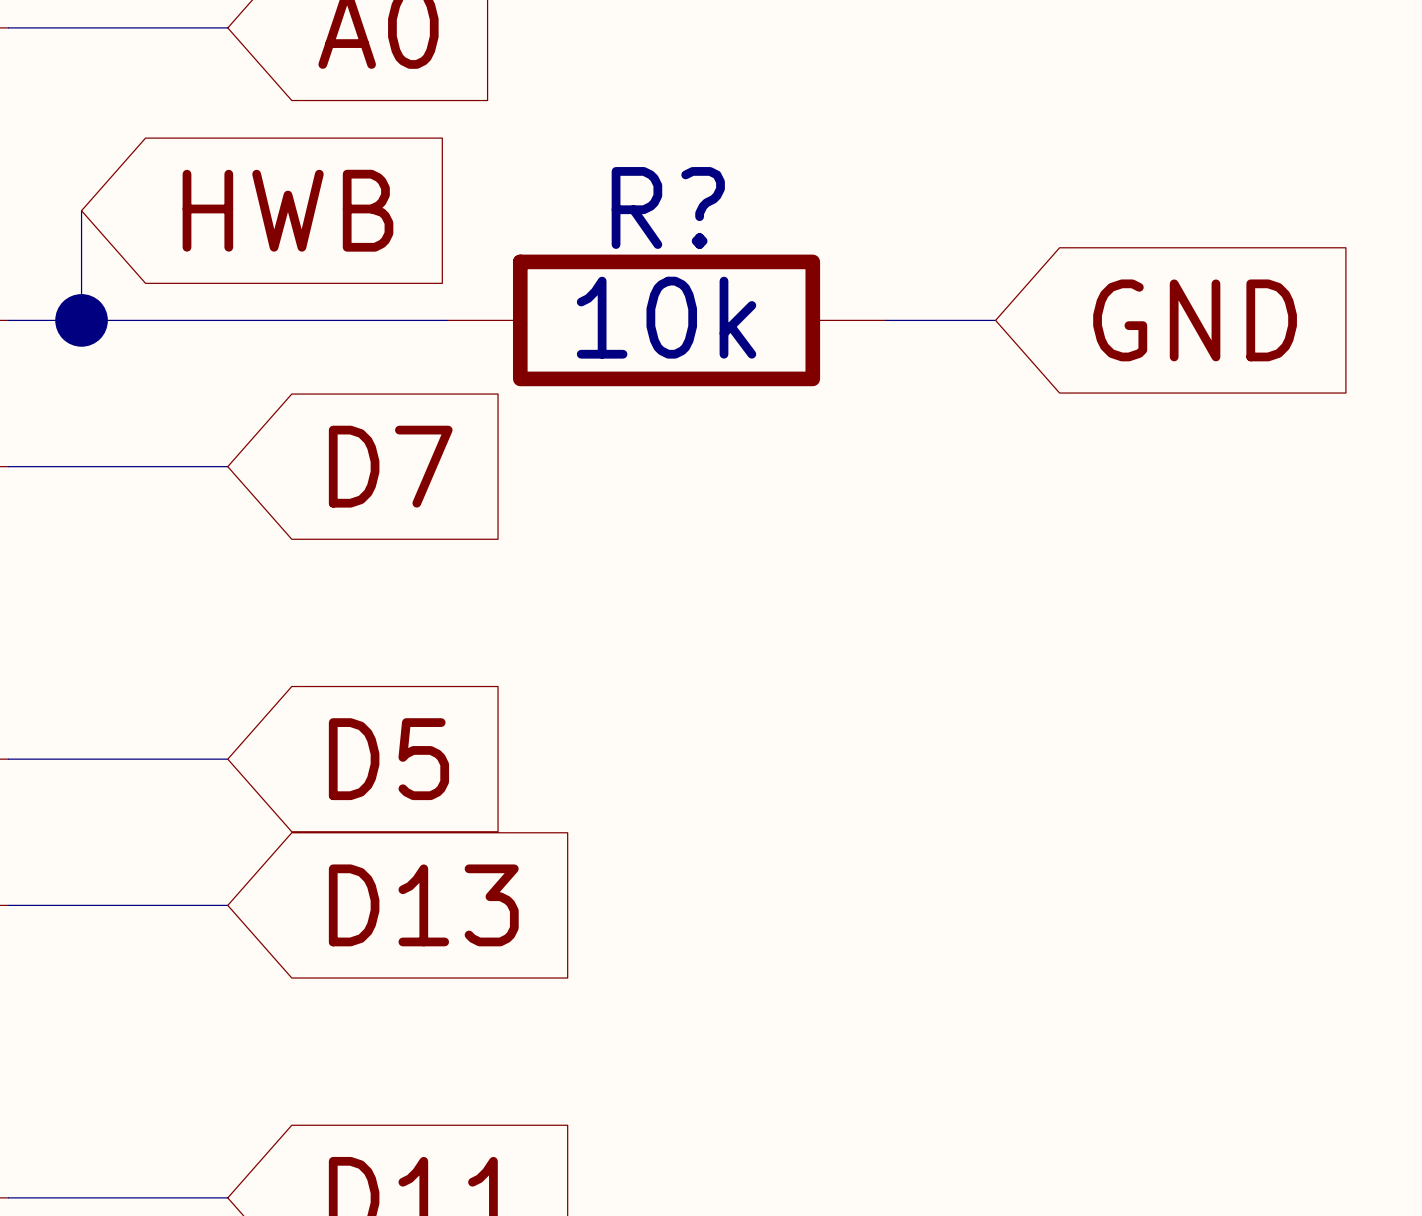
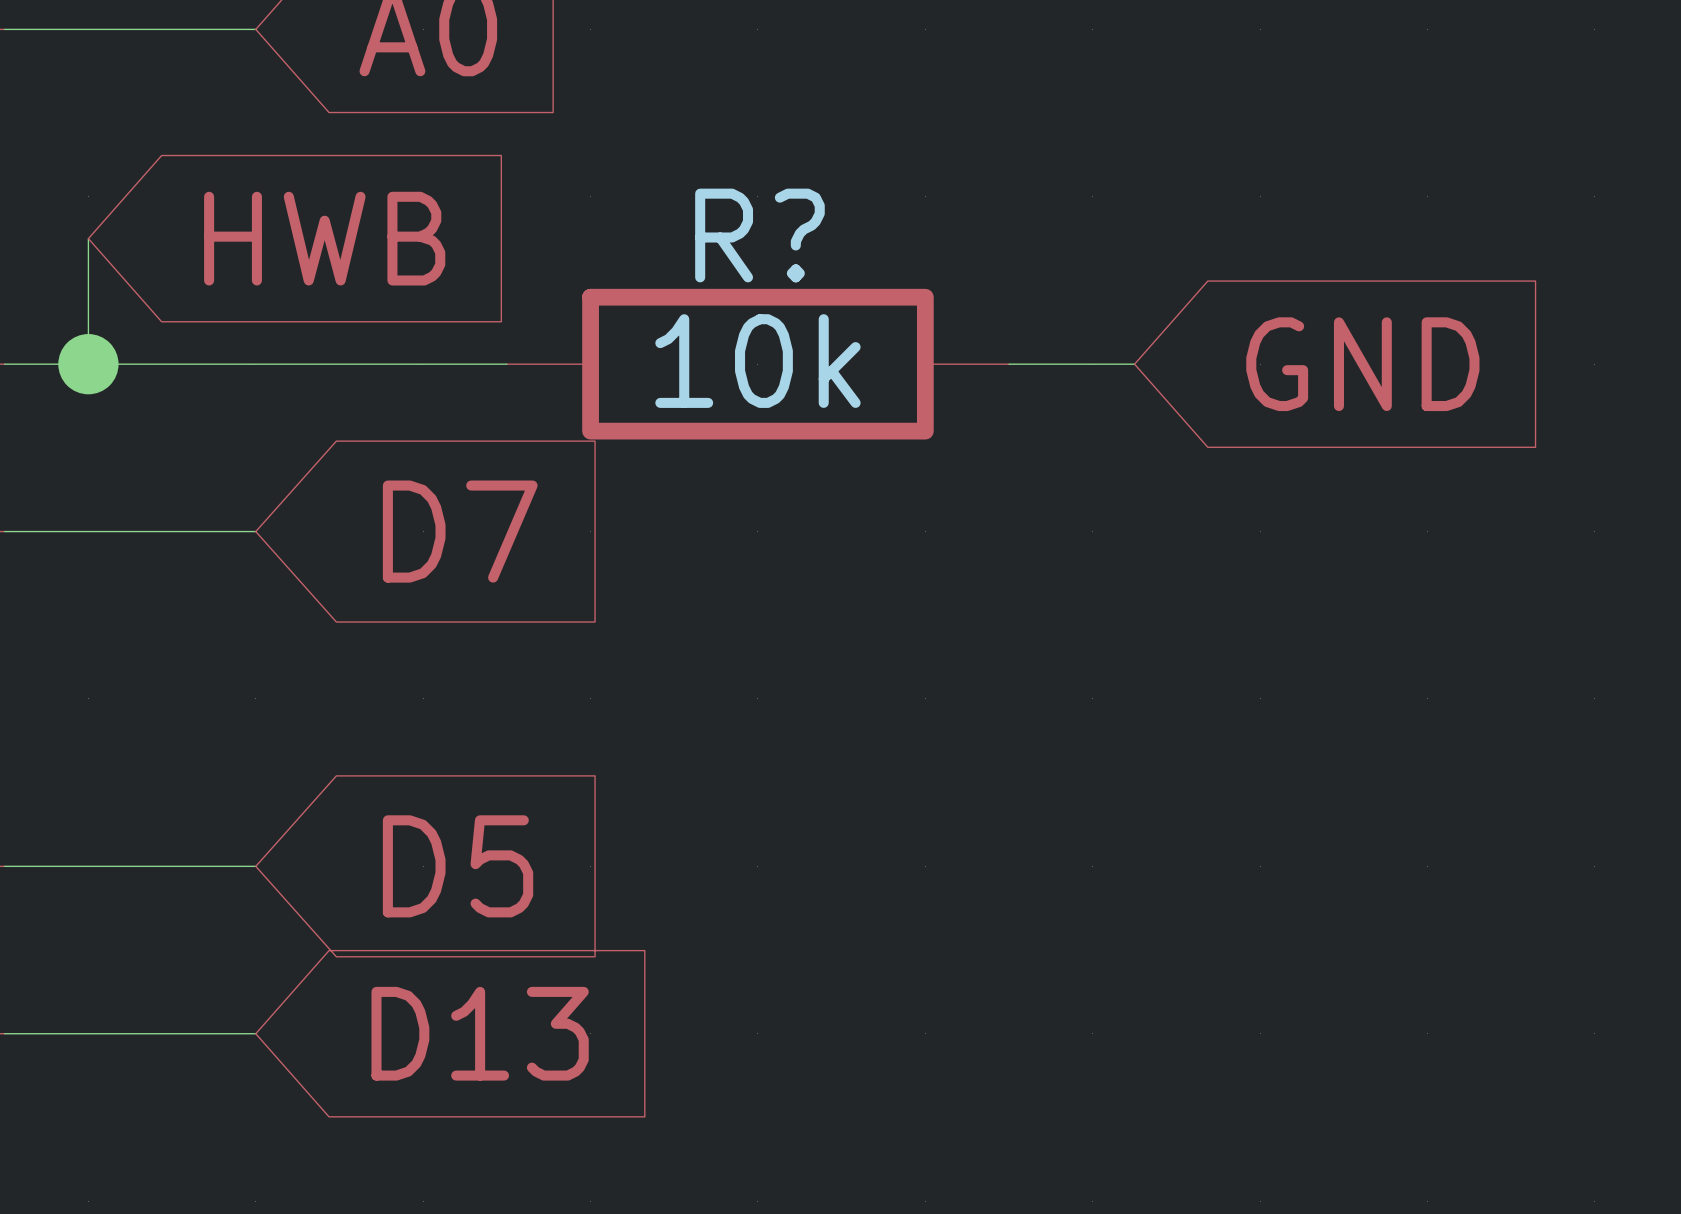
global label position: D7 (390, 466) -> D7 (460, 531)
global label position: D5 (388, 759) -> D5 (458, 866)

